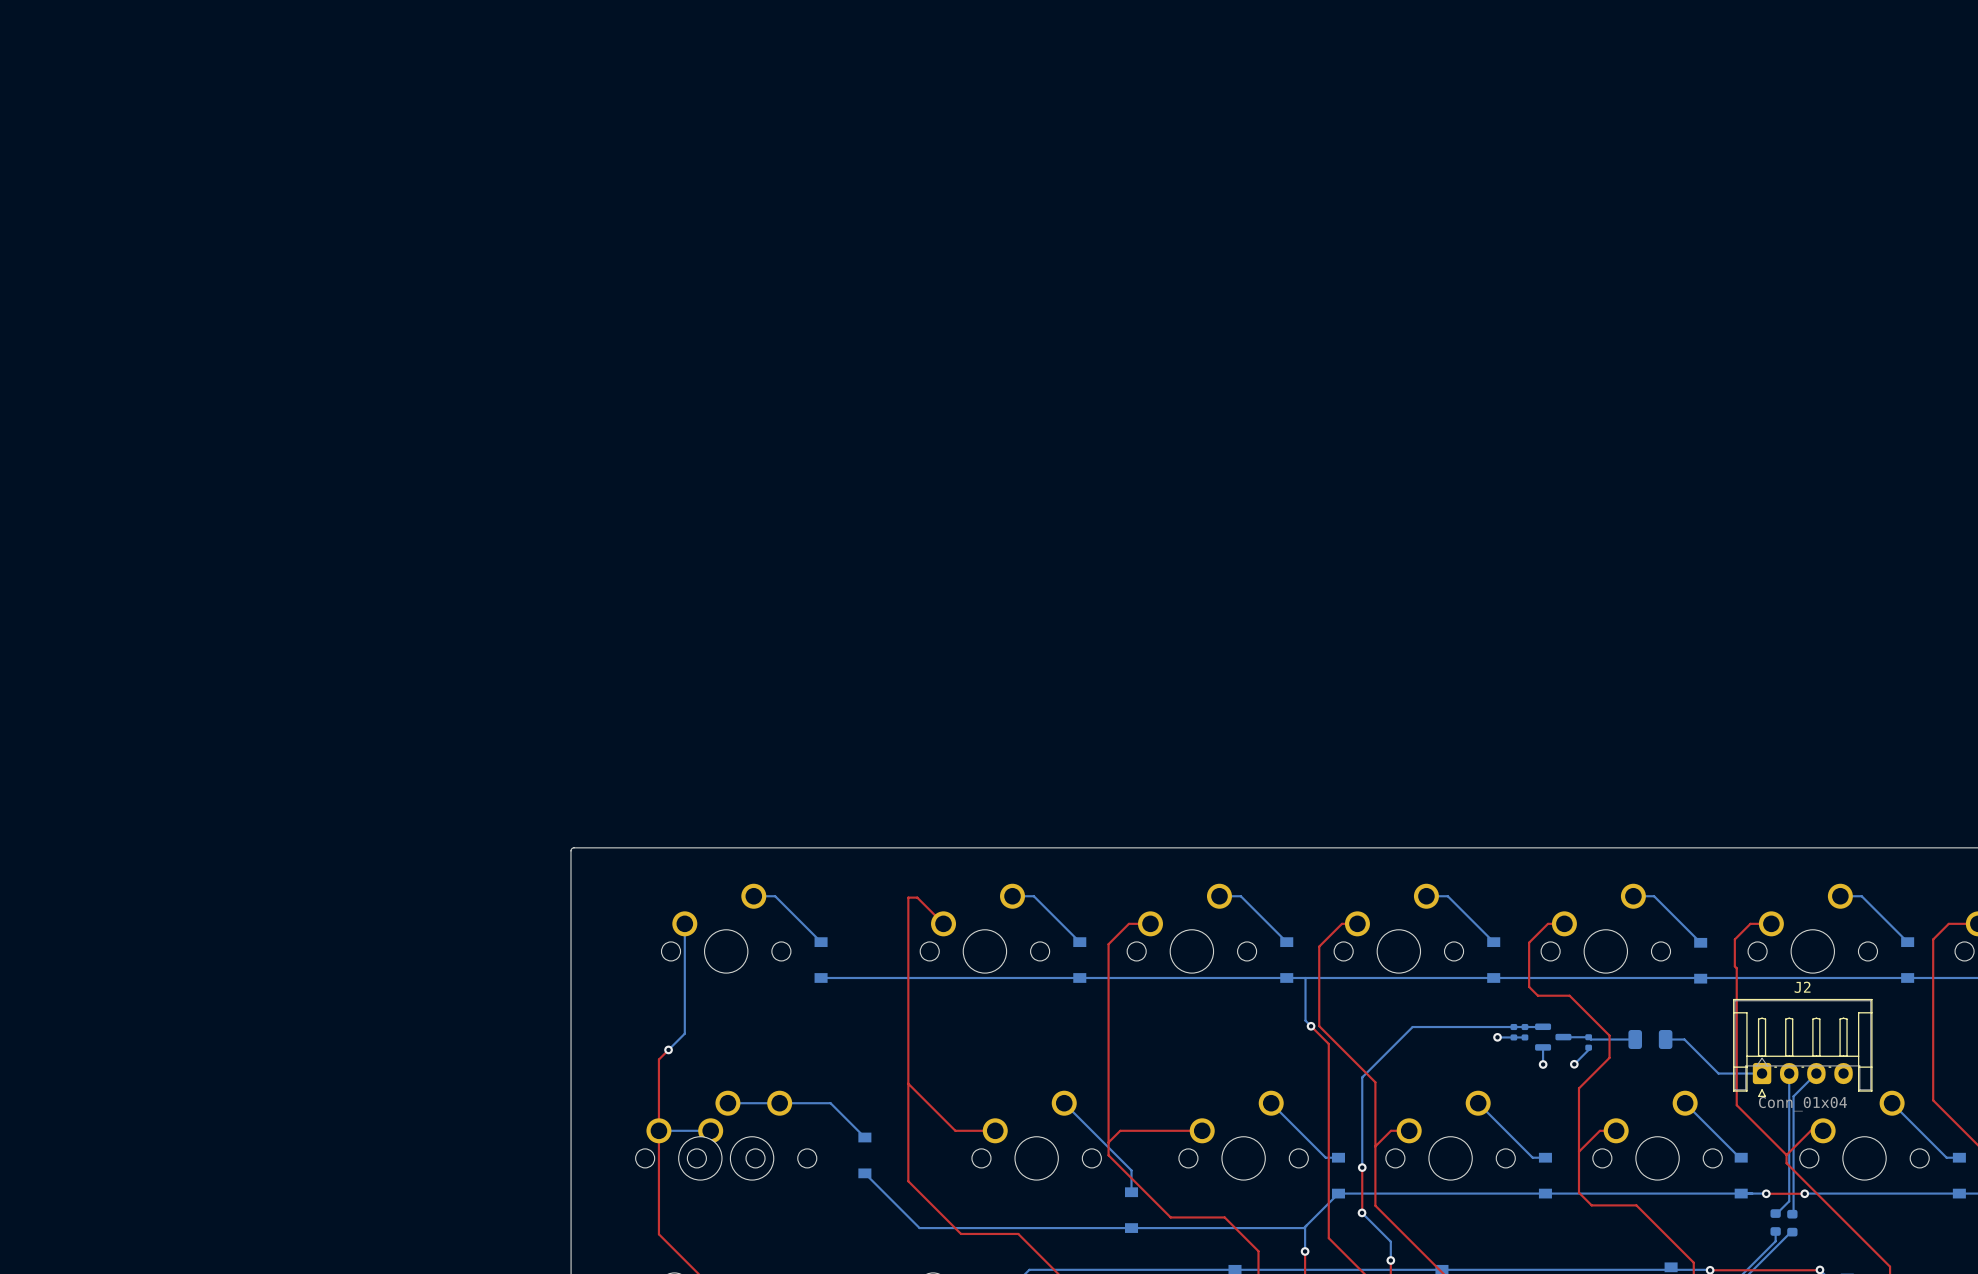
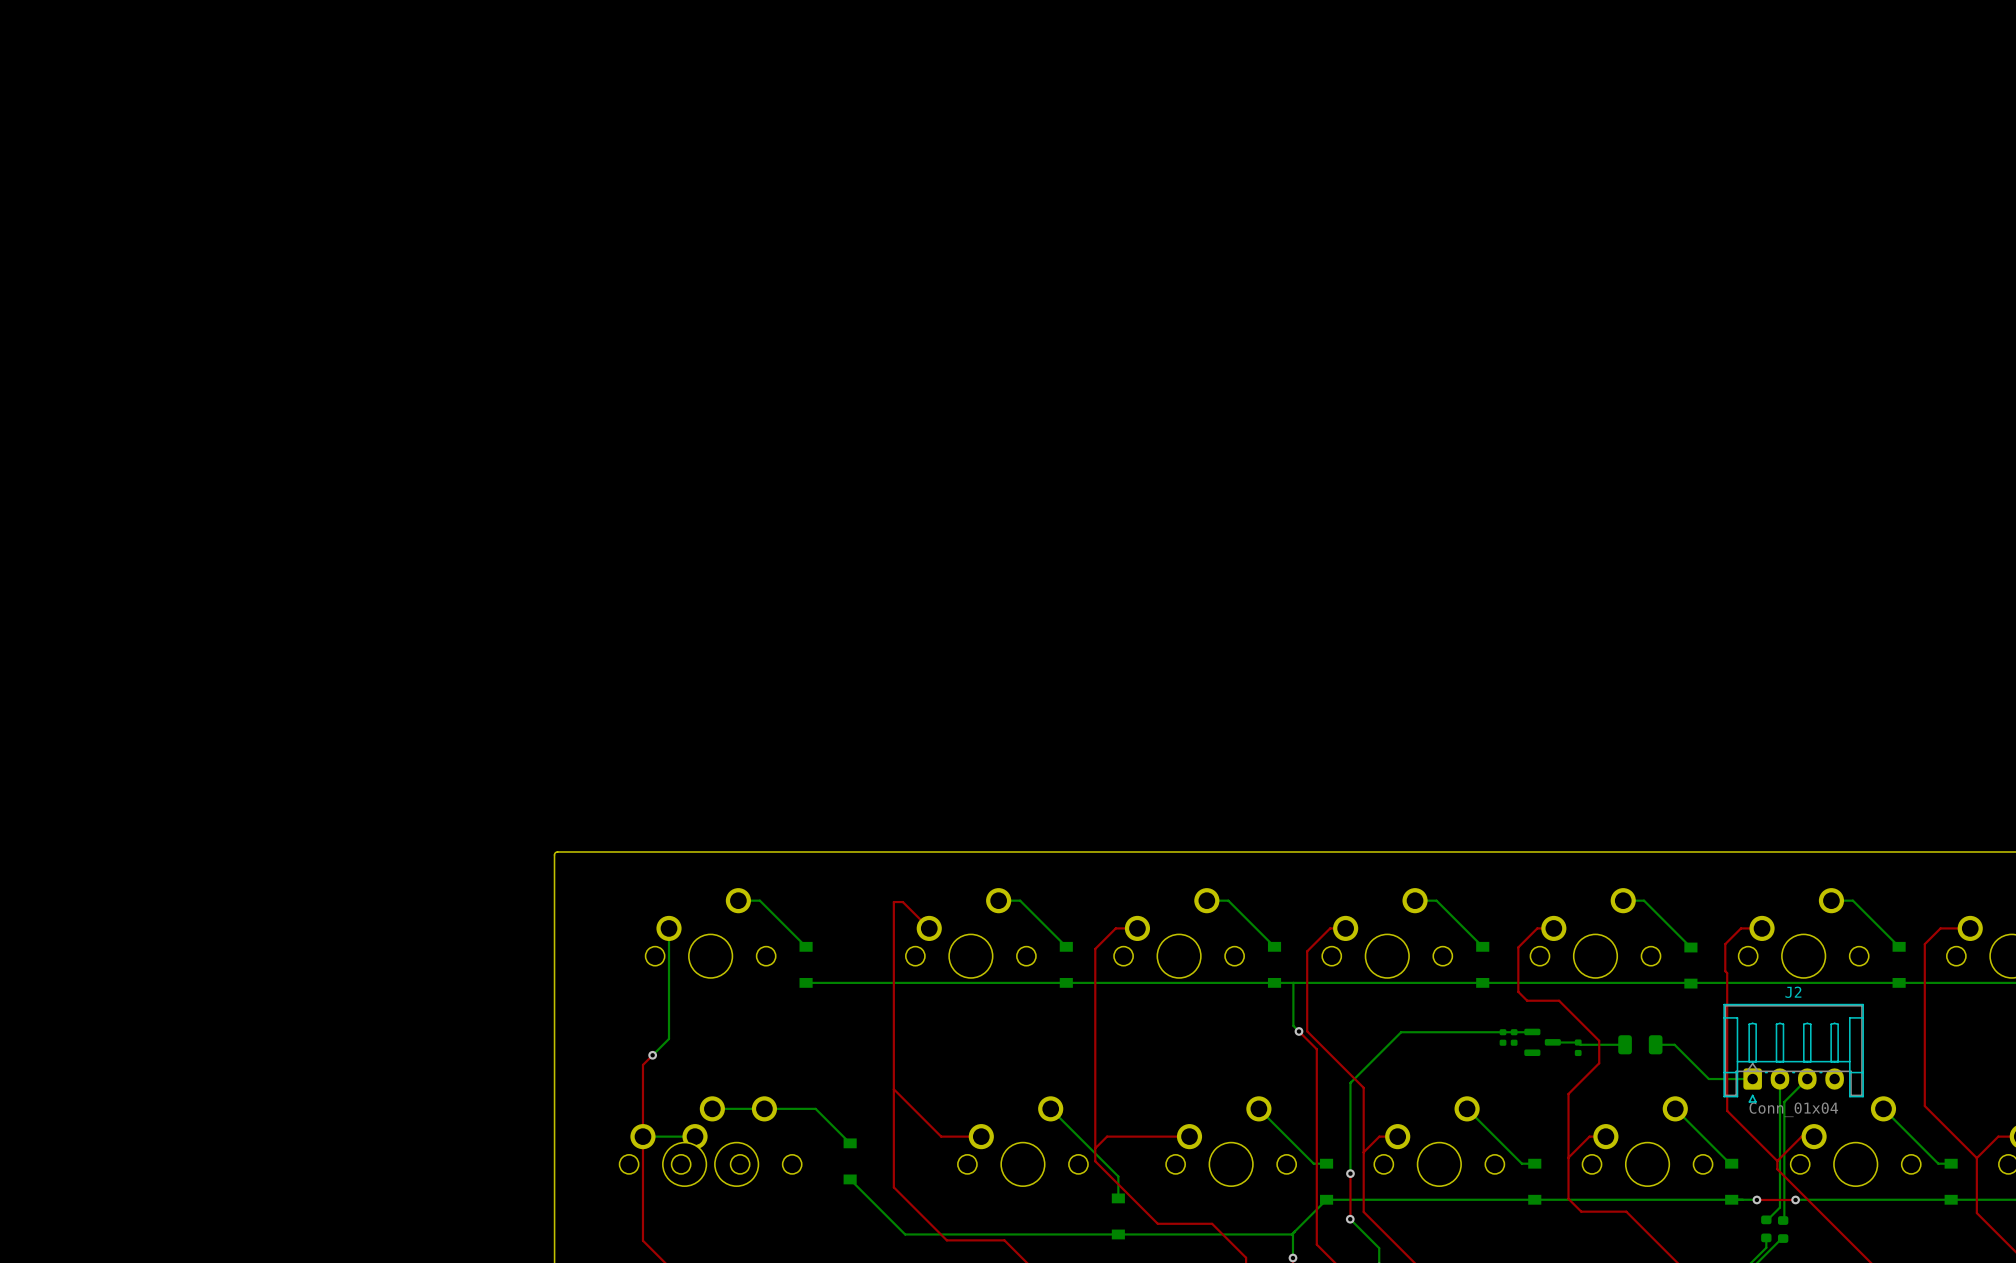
bottom track: (1497, 1037) (1524, 1037) -> none
via: (1497, 1037) -> none
bottom track: (1543, 1047) (1543, 1064) -> none
bottom track: (1588, 1047) (1574, 1064) -> none
via: (1543, 1064) -> none
via: (1574, 1064) -> none

